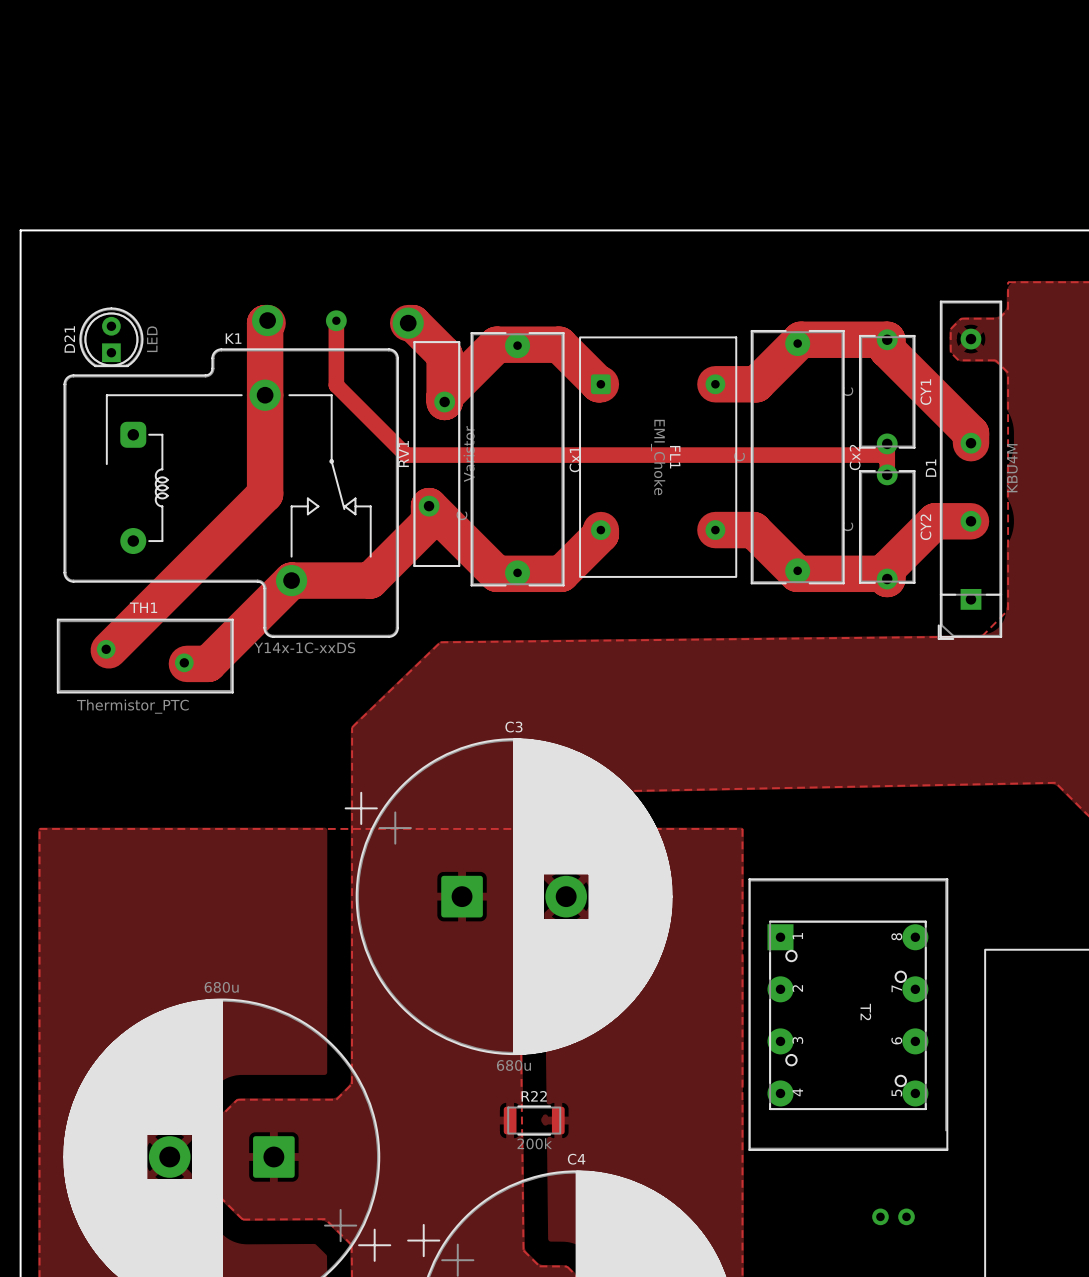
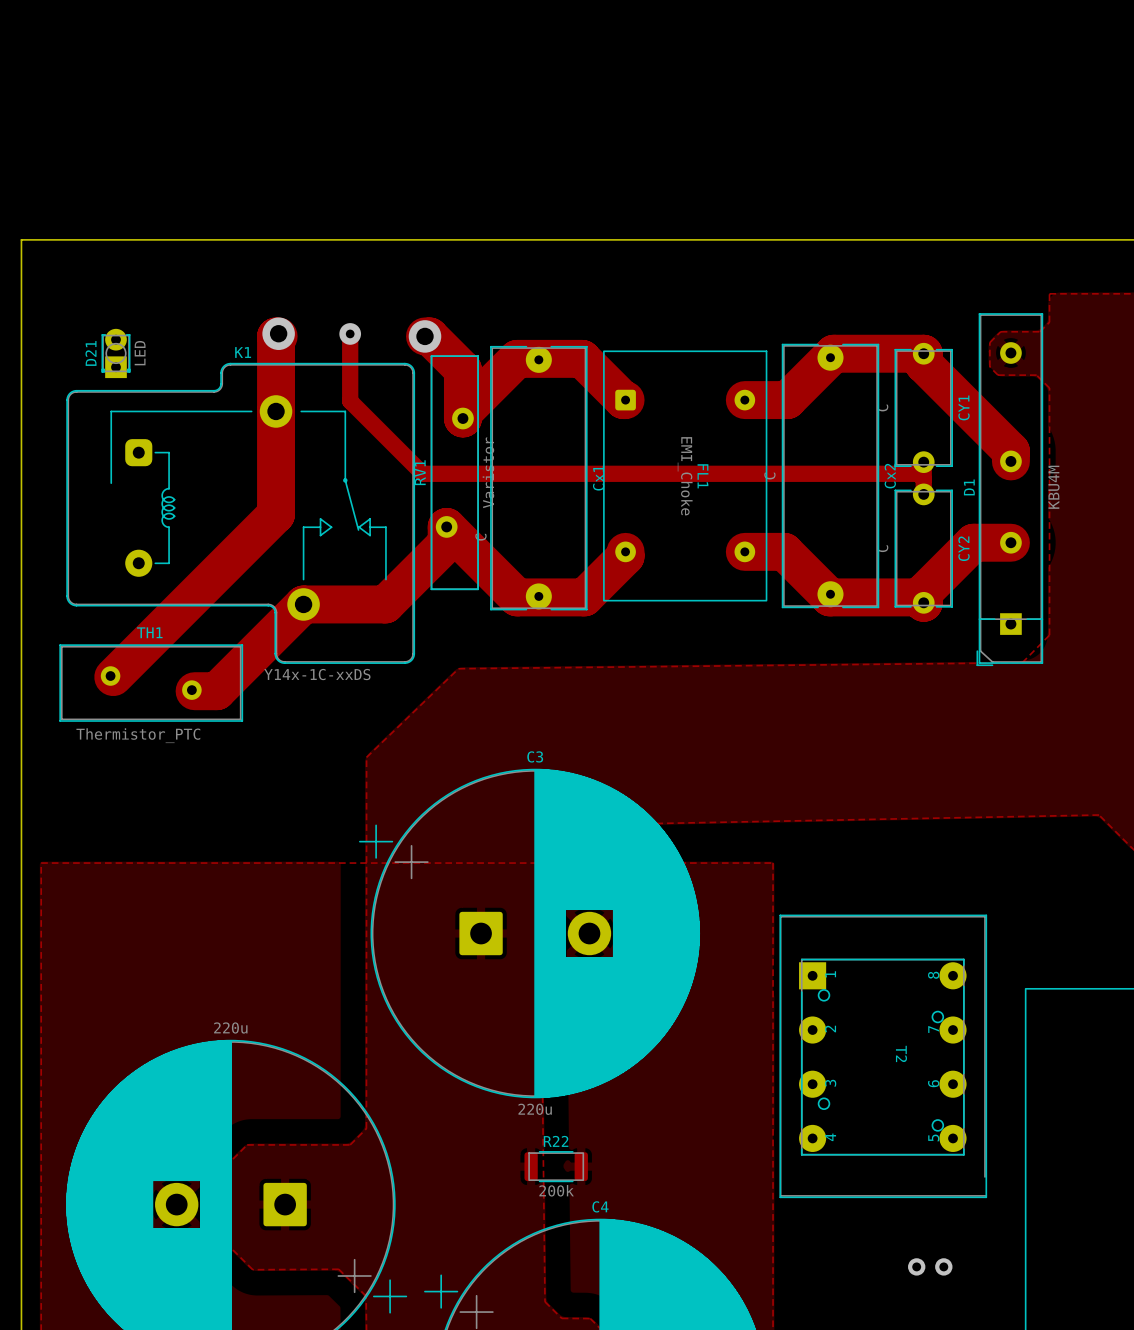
D21 footprint: [79, 307, 144, 367] -> [101, 328, 131, 379]
part value: 680u (221, 987) -> 220u (230, 1027)
C3 value: 680u (513, 1065) -> 220u (535, 1109)

